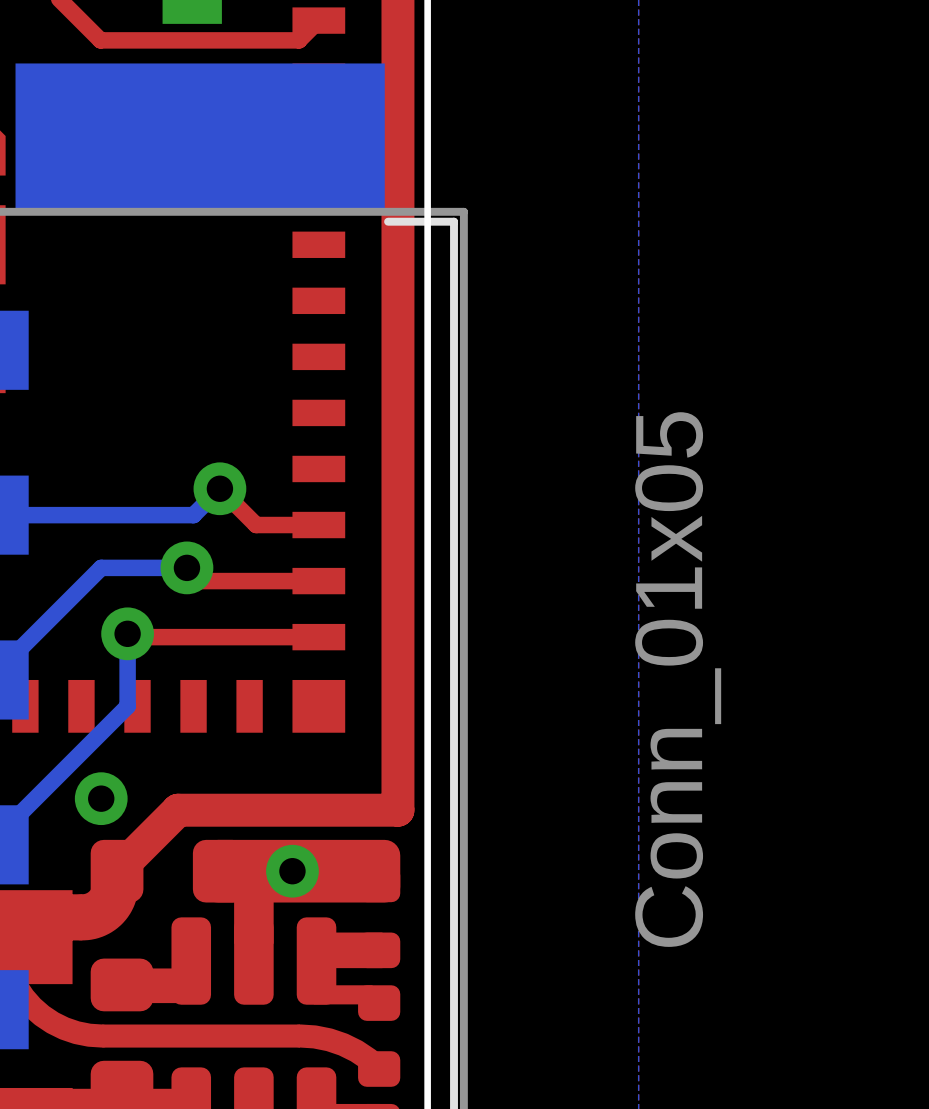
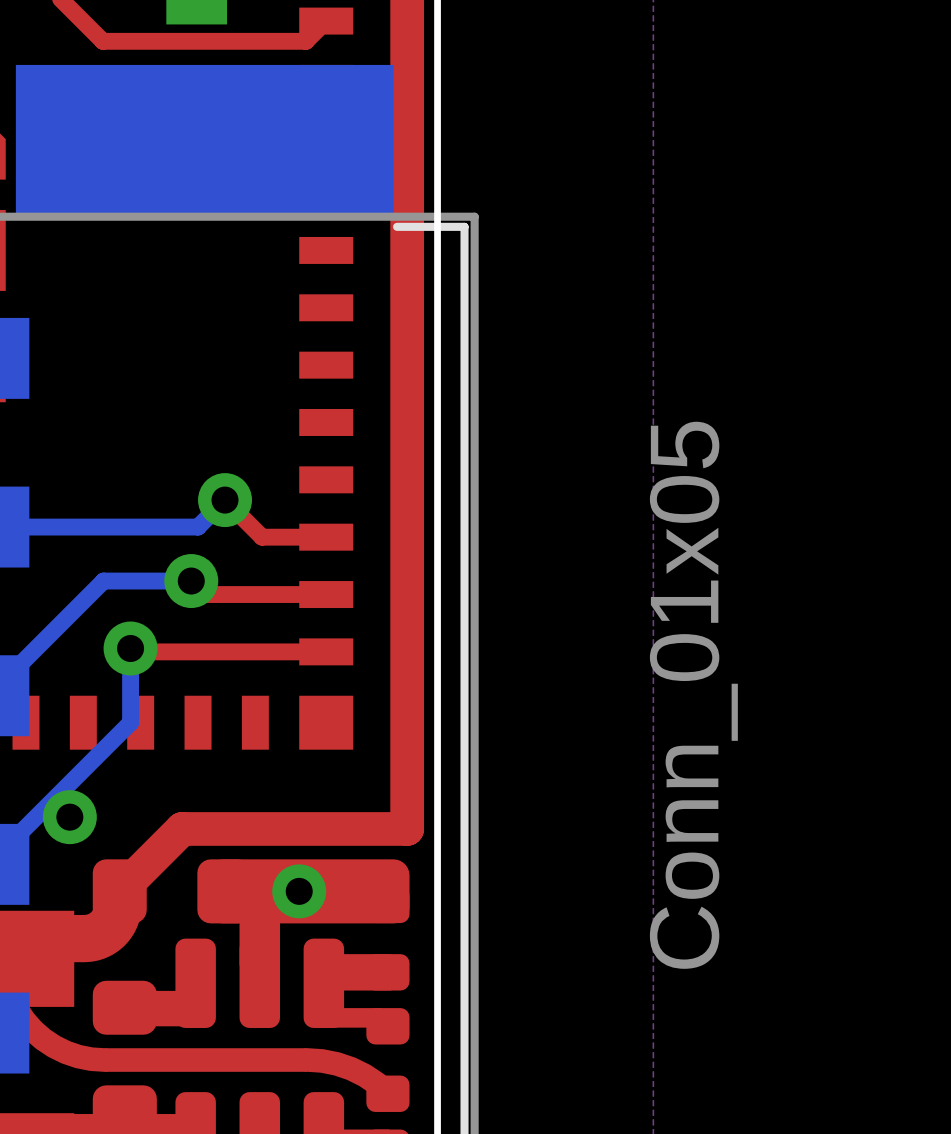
via position: (101, 798) -> (69, 817)

